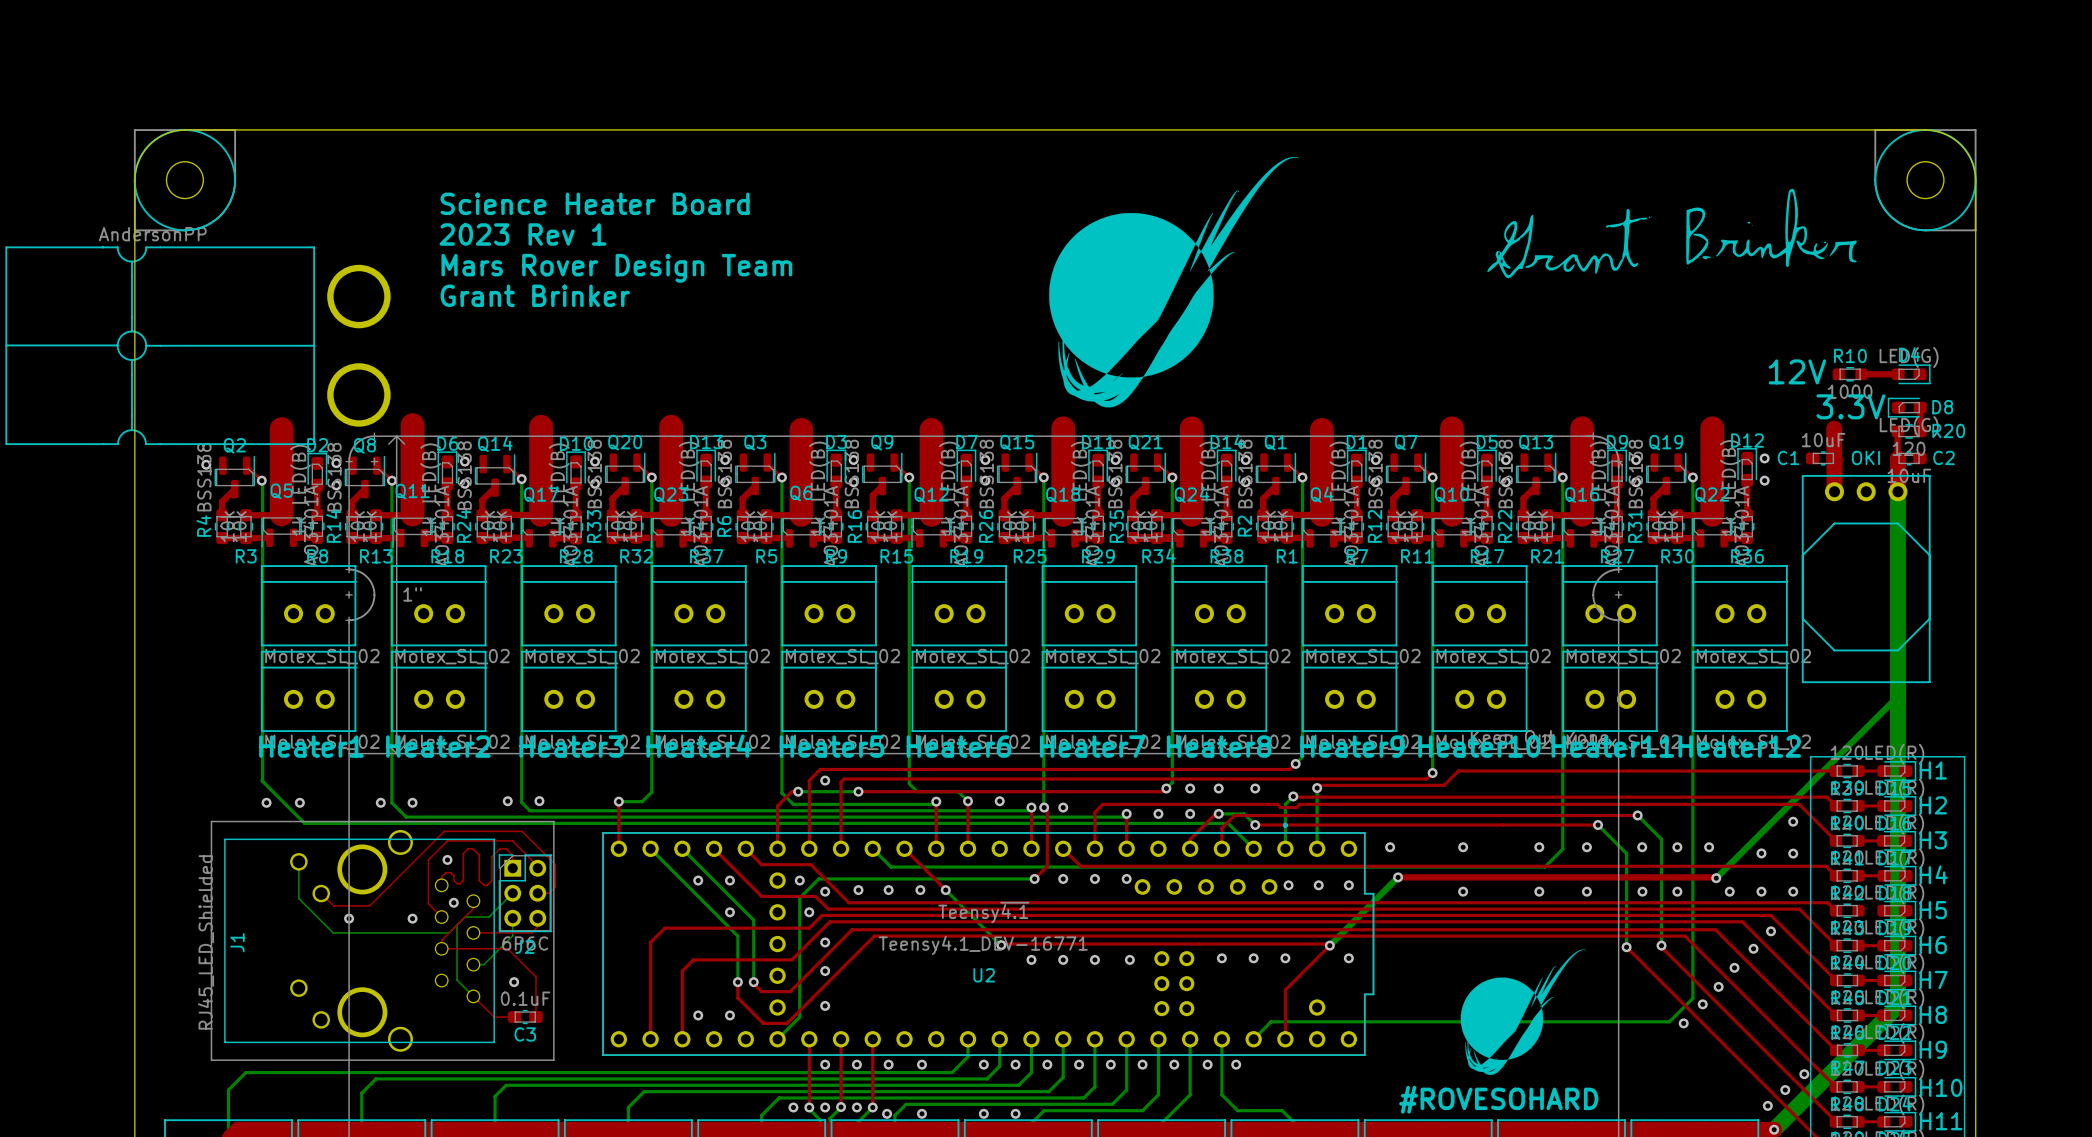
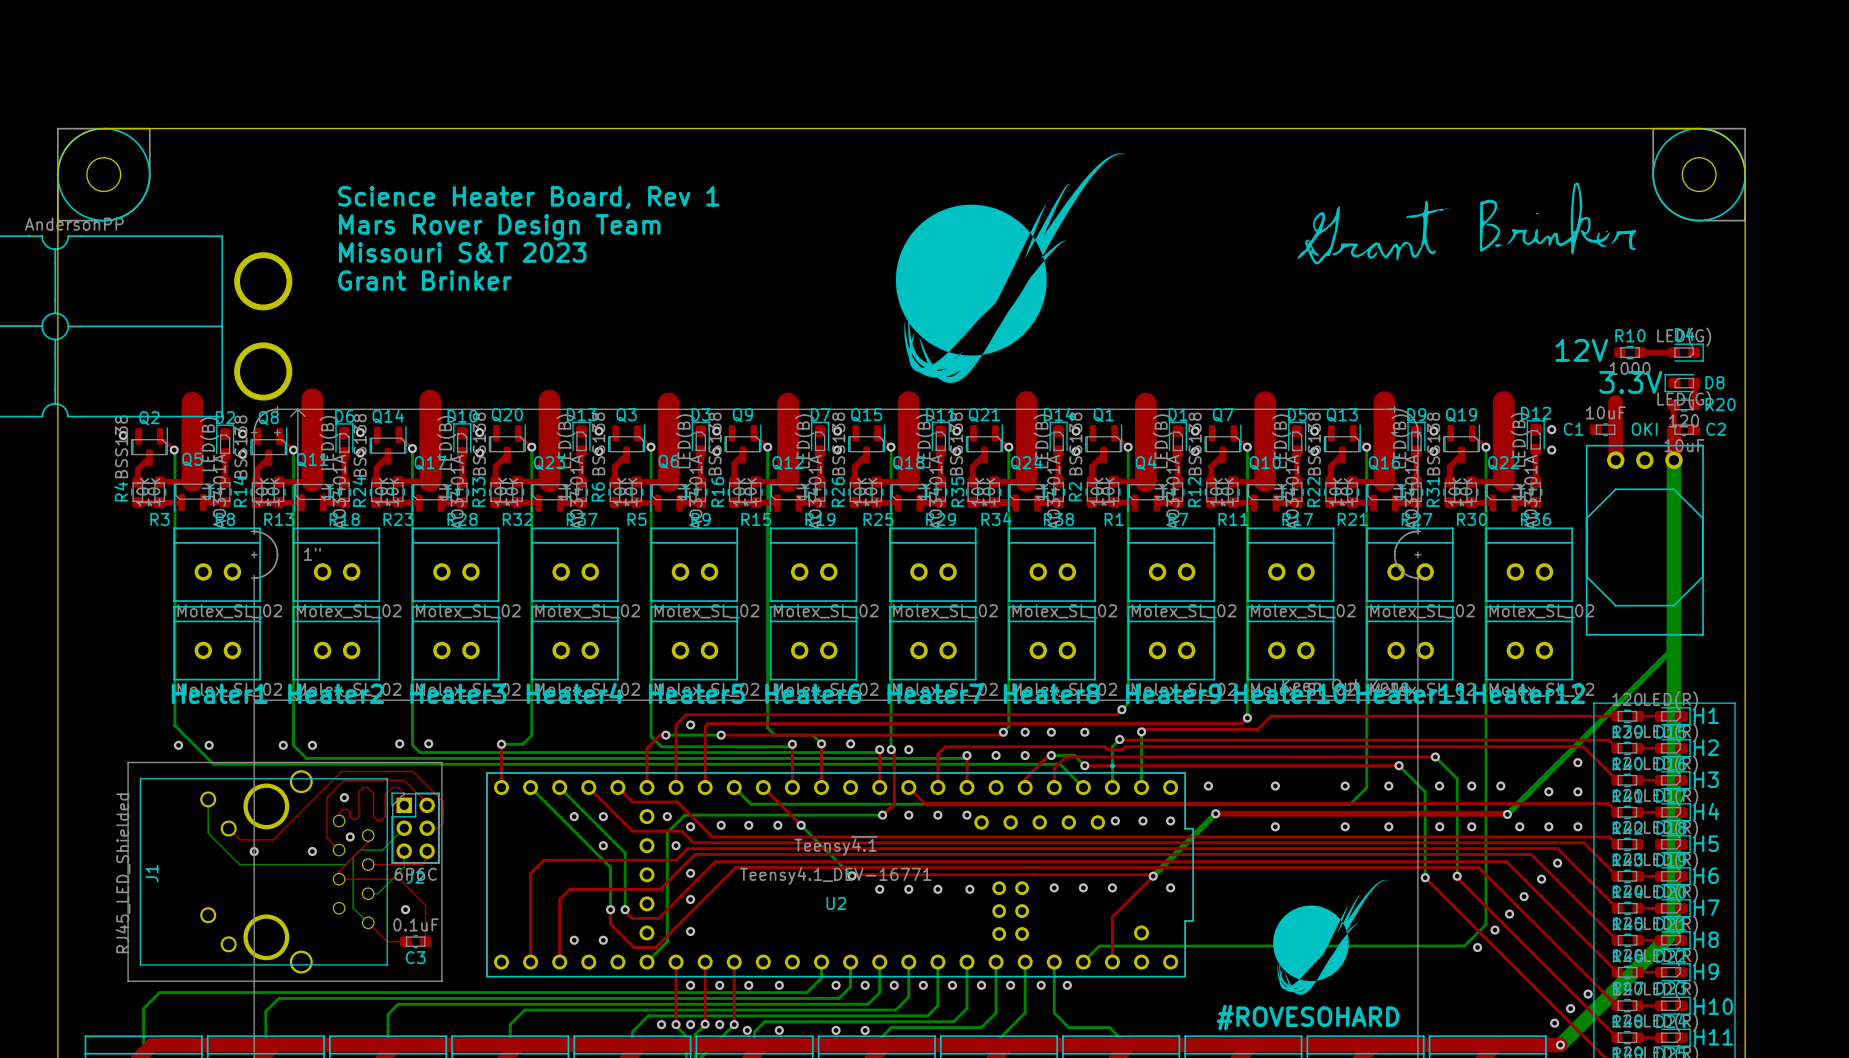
text: Science Heater Board (595, 203) -> Science Heater Board, Rev 1 (528, 197)
text: 2023 Rev 1 (522, 234) -> Mars Rover Design Team (499, 227)
text: Mars Rover Design Team (616, 268) -> Missouri S&T 2023 (462, 252)

